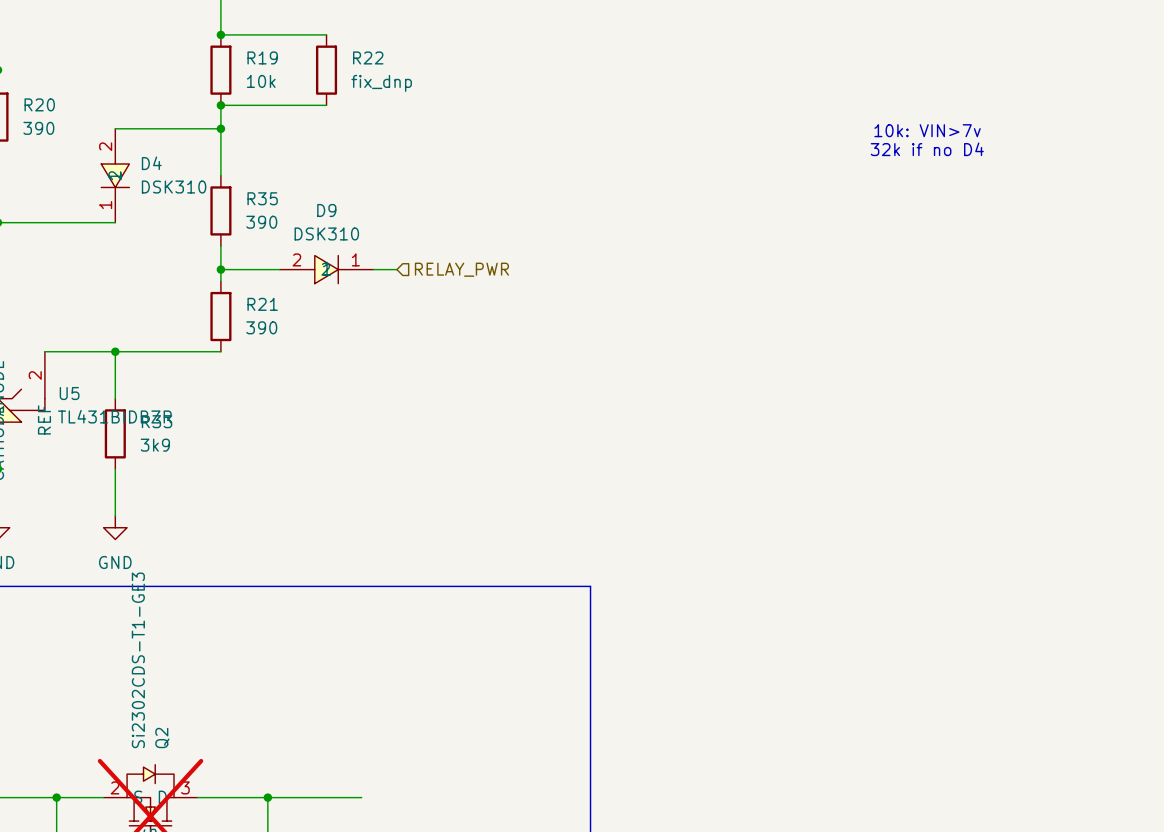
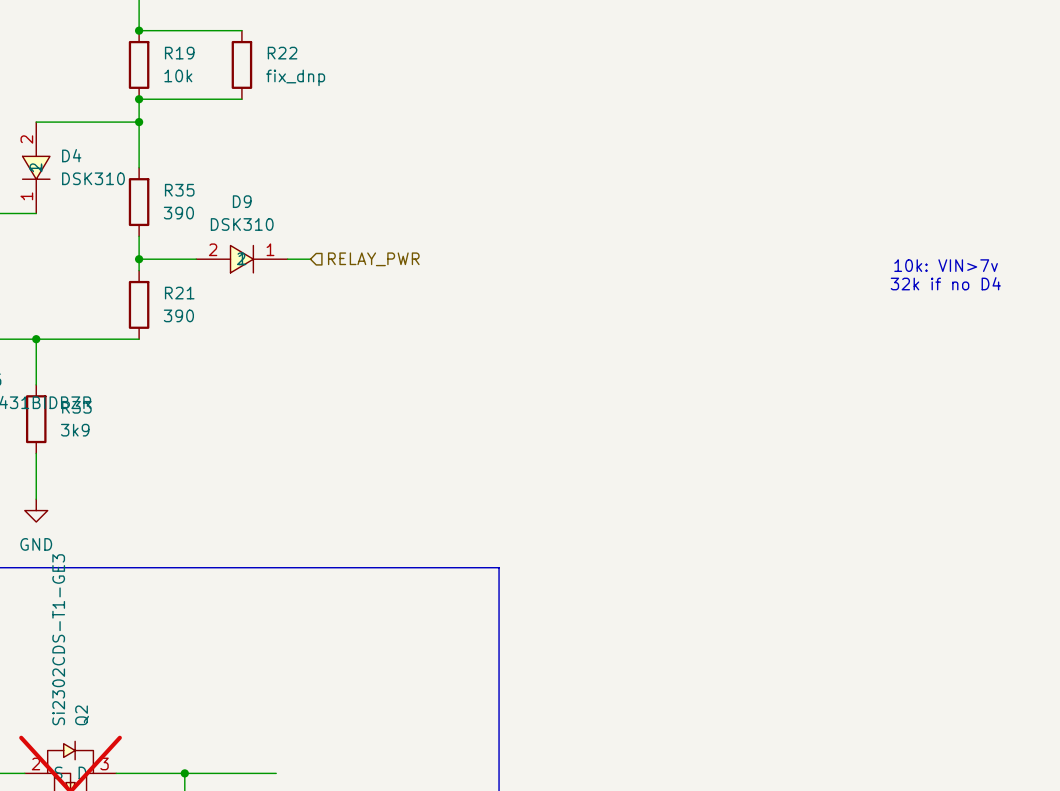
text position: 10k: VIN>7v (927, 130) -> 10k: VIN>7v (946, 265)
text position: 32k if no D4 (927, 149) -> 32k if no D4 (945, 283)

